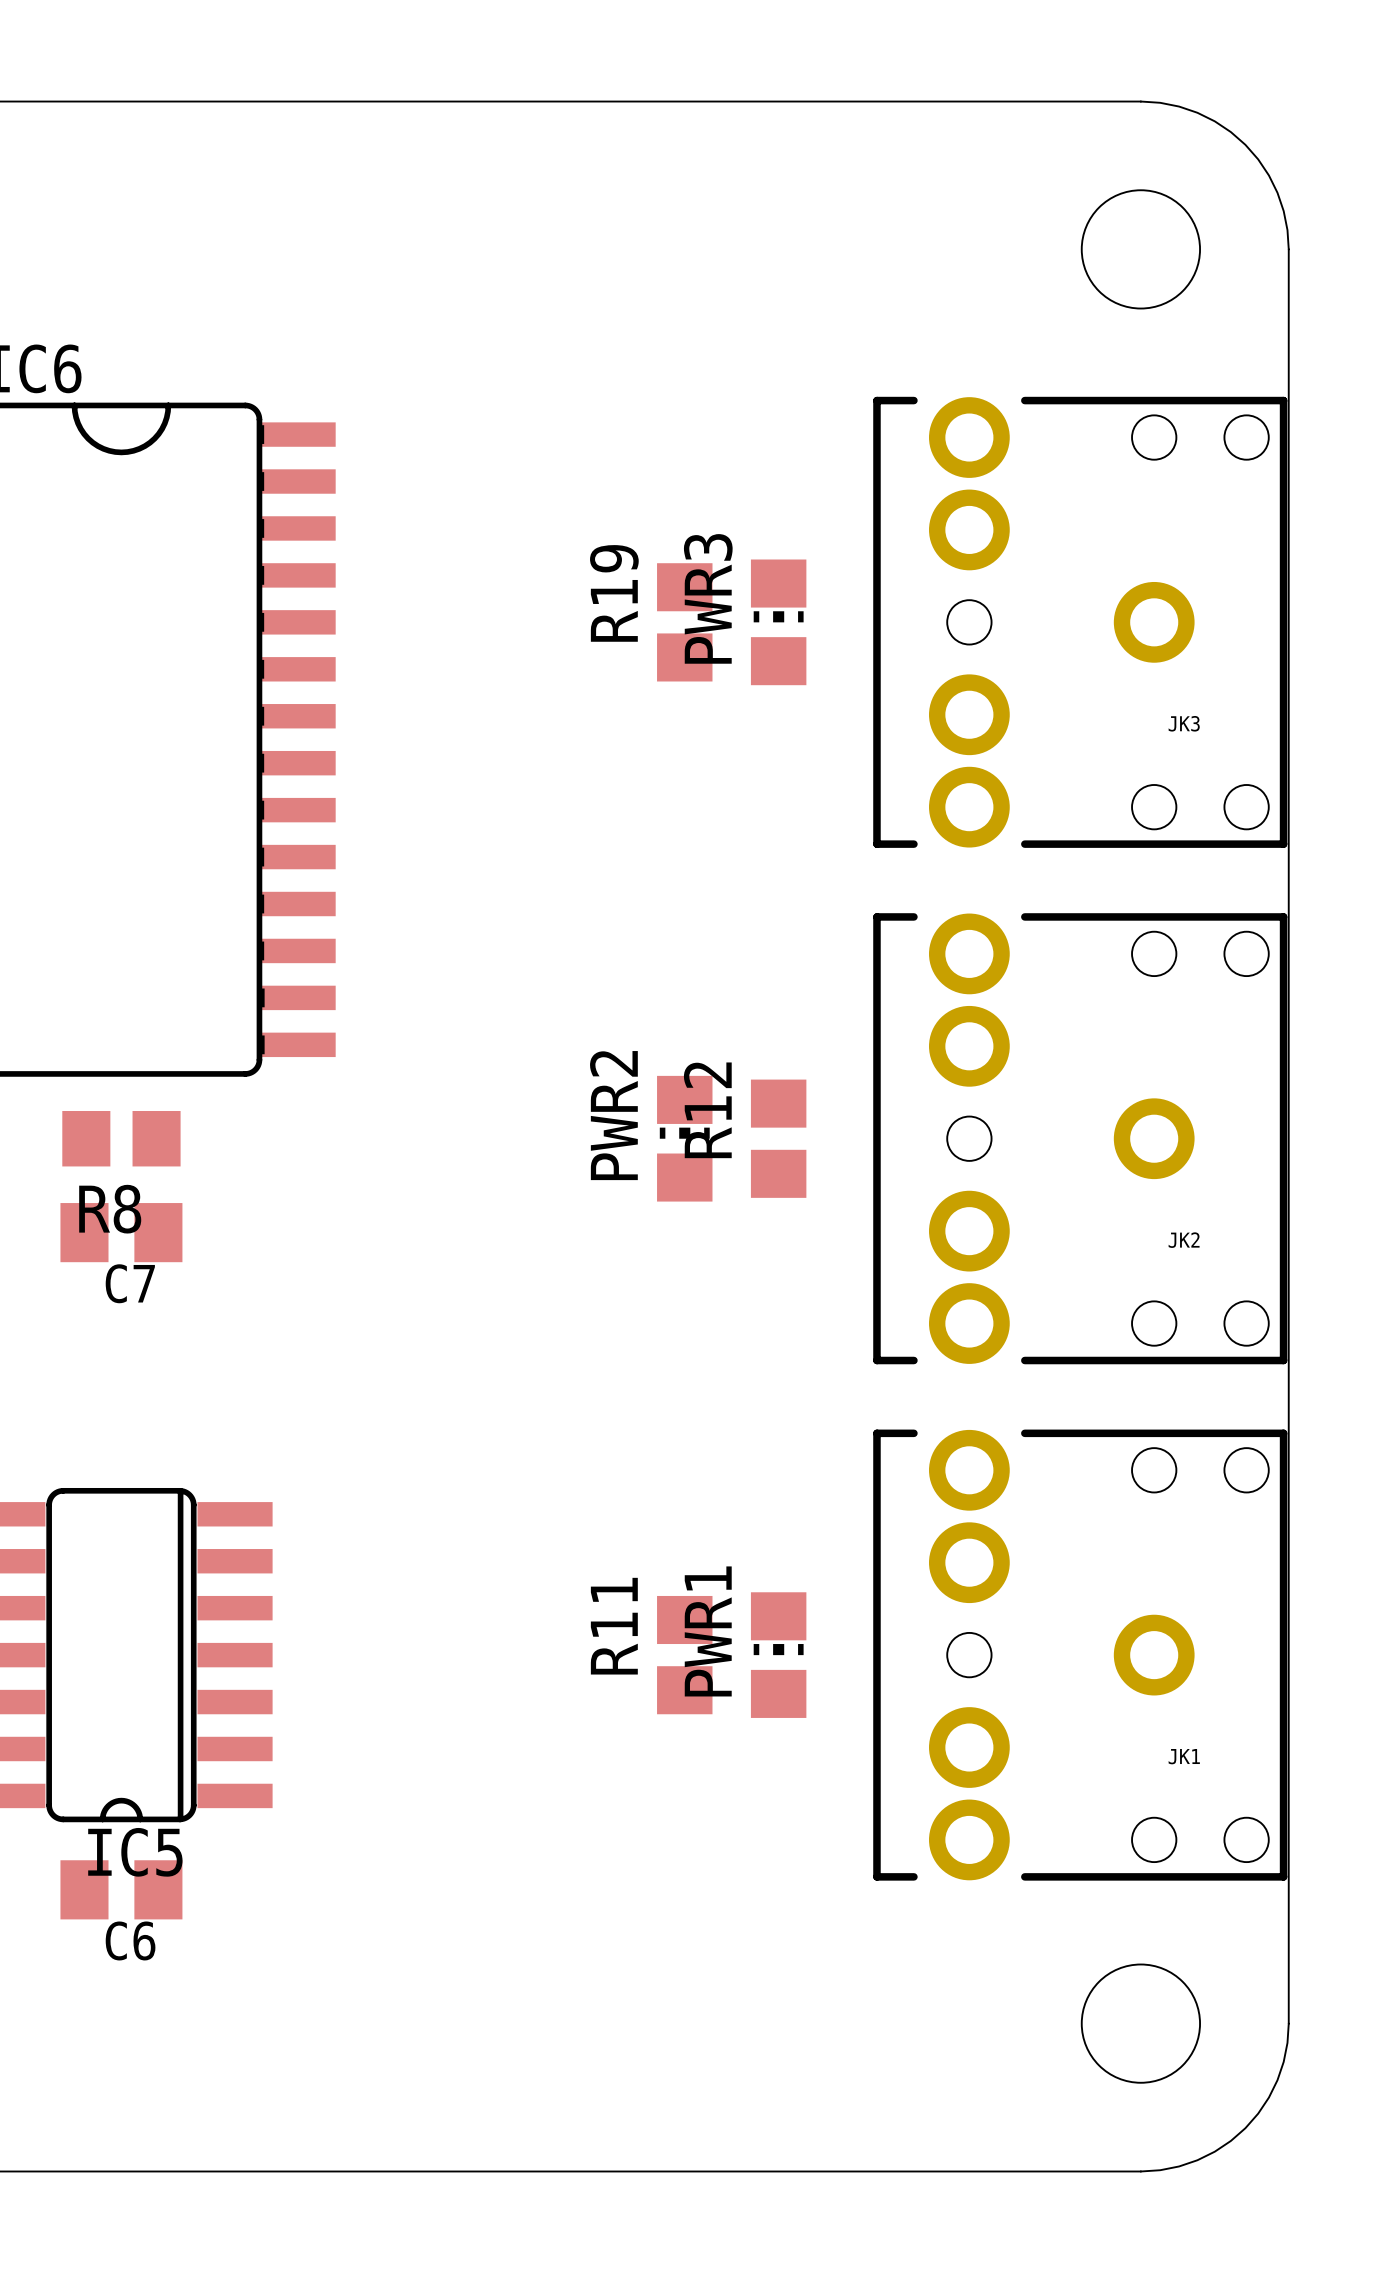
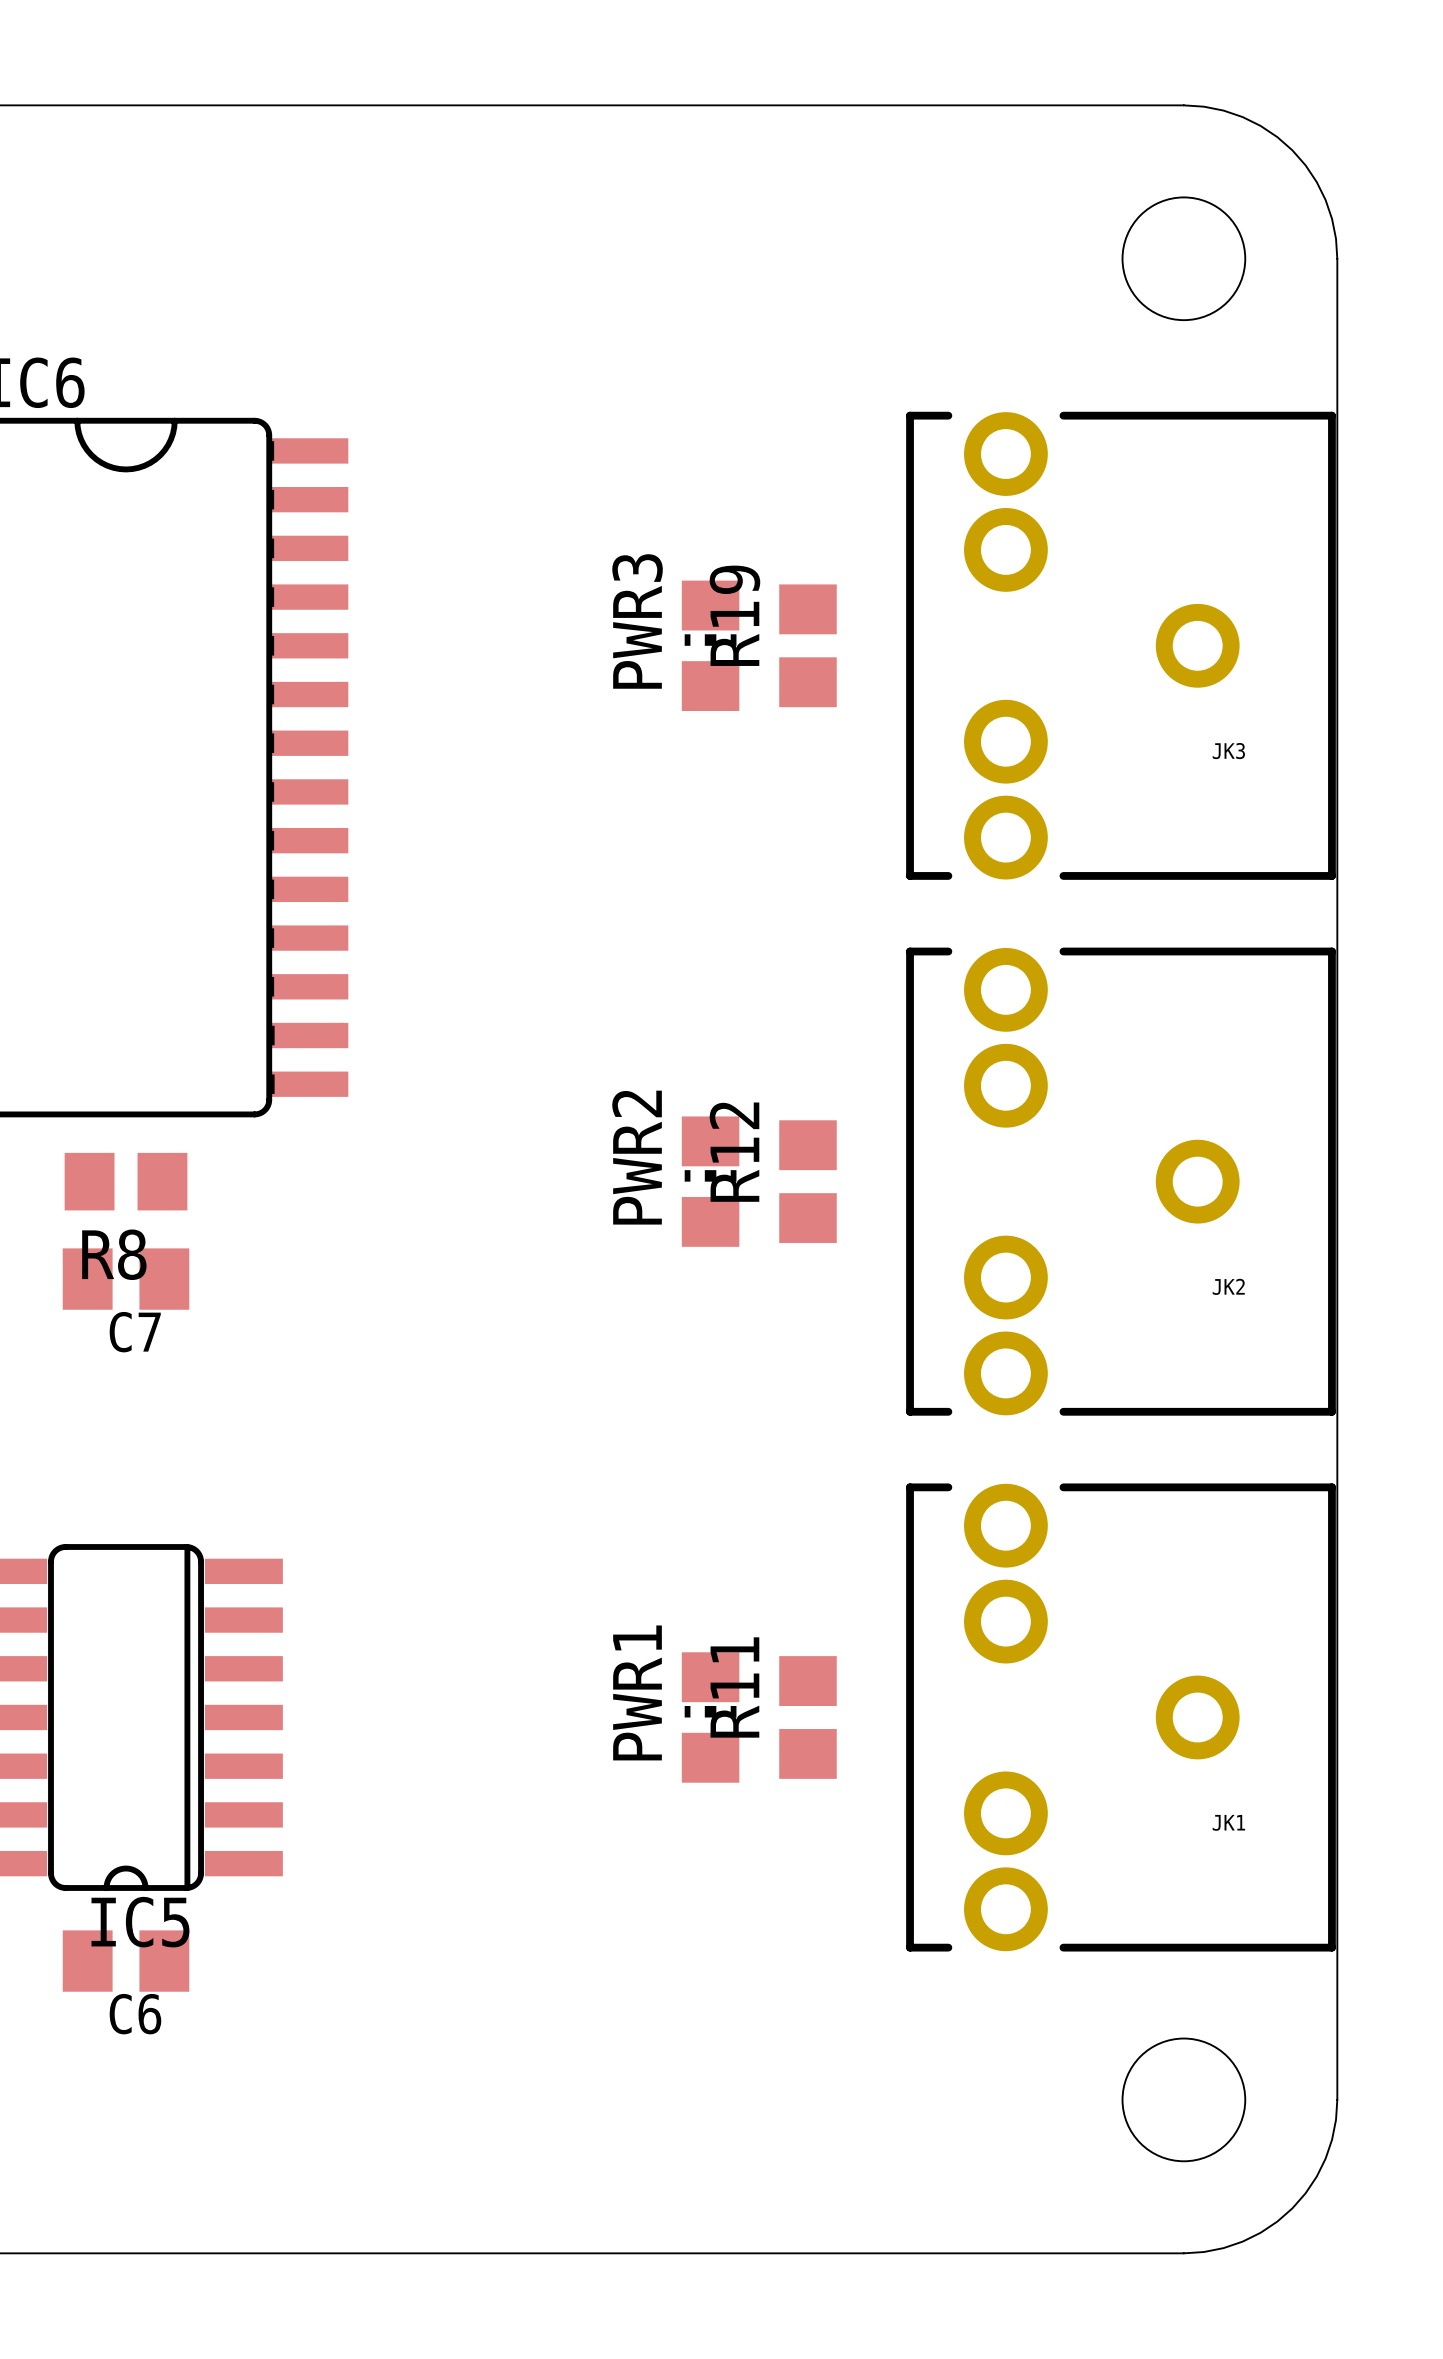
JK3 footprint: [873, 396, 1288, 848] -> [906, 411, 1336, 880]
R19 position: (684, 622) -> (808, 645)
PWR3 position: (778, 622) -> (710, 645)
JK2 footprint: [873, 913, 1288, 1365] -> [906, 947, 1336, 1416]
JK1 footprint: [873, 1429, 1288, 1881] -> [906, 1483, 1336, 1952]
R11 position: (684, 1655) -> (808, 1717)
PWR1 position: (778, 1655) -> (710, 1717)

